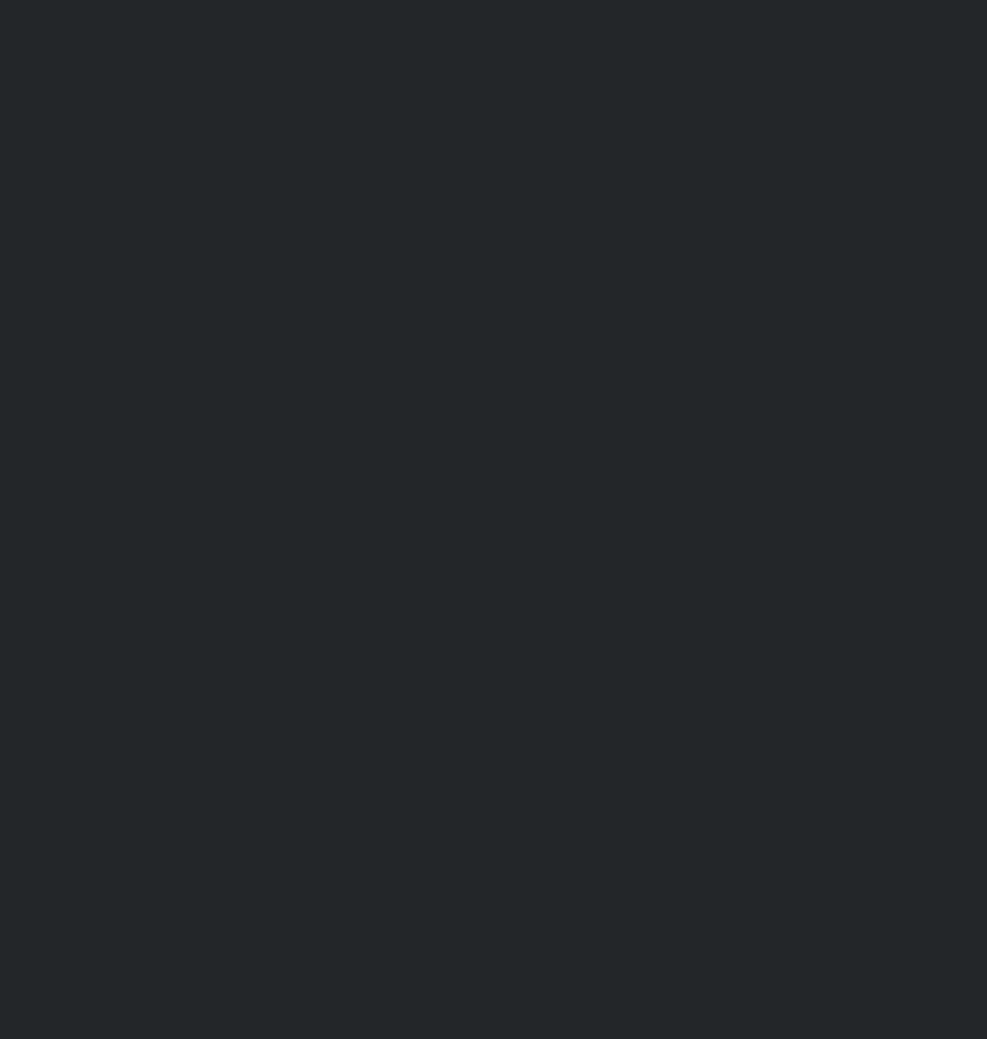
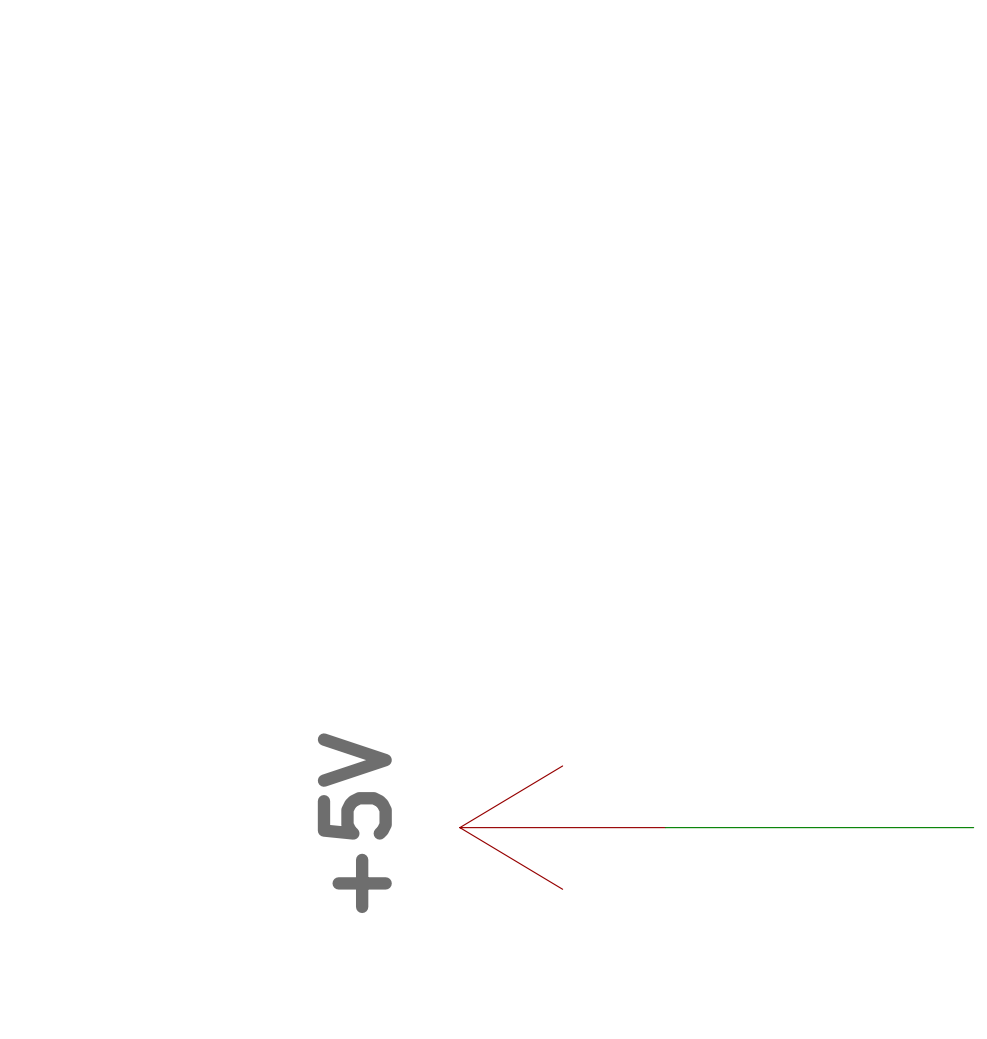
power symbol: none -> +5V (562, 827)
wire: none -> (665, 827) (973, 827)

